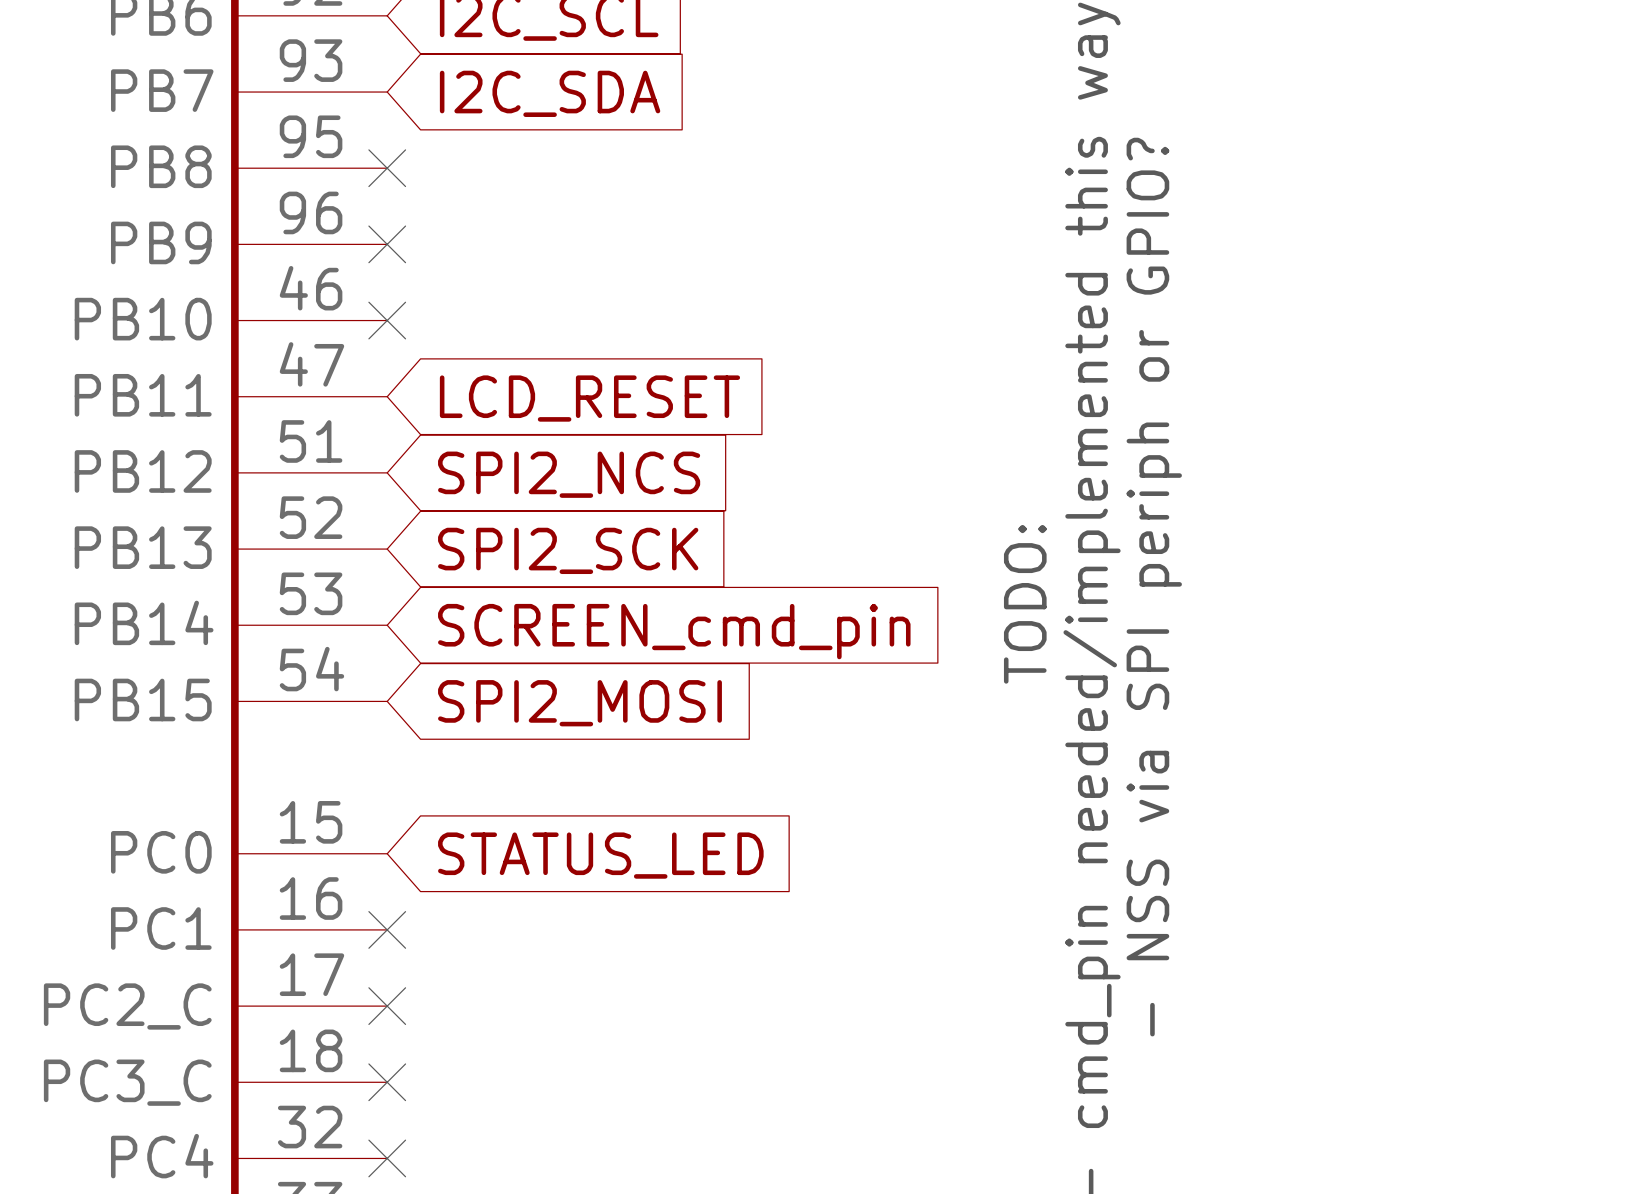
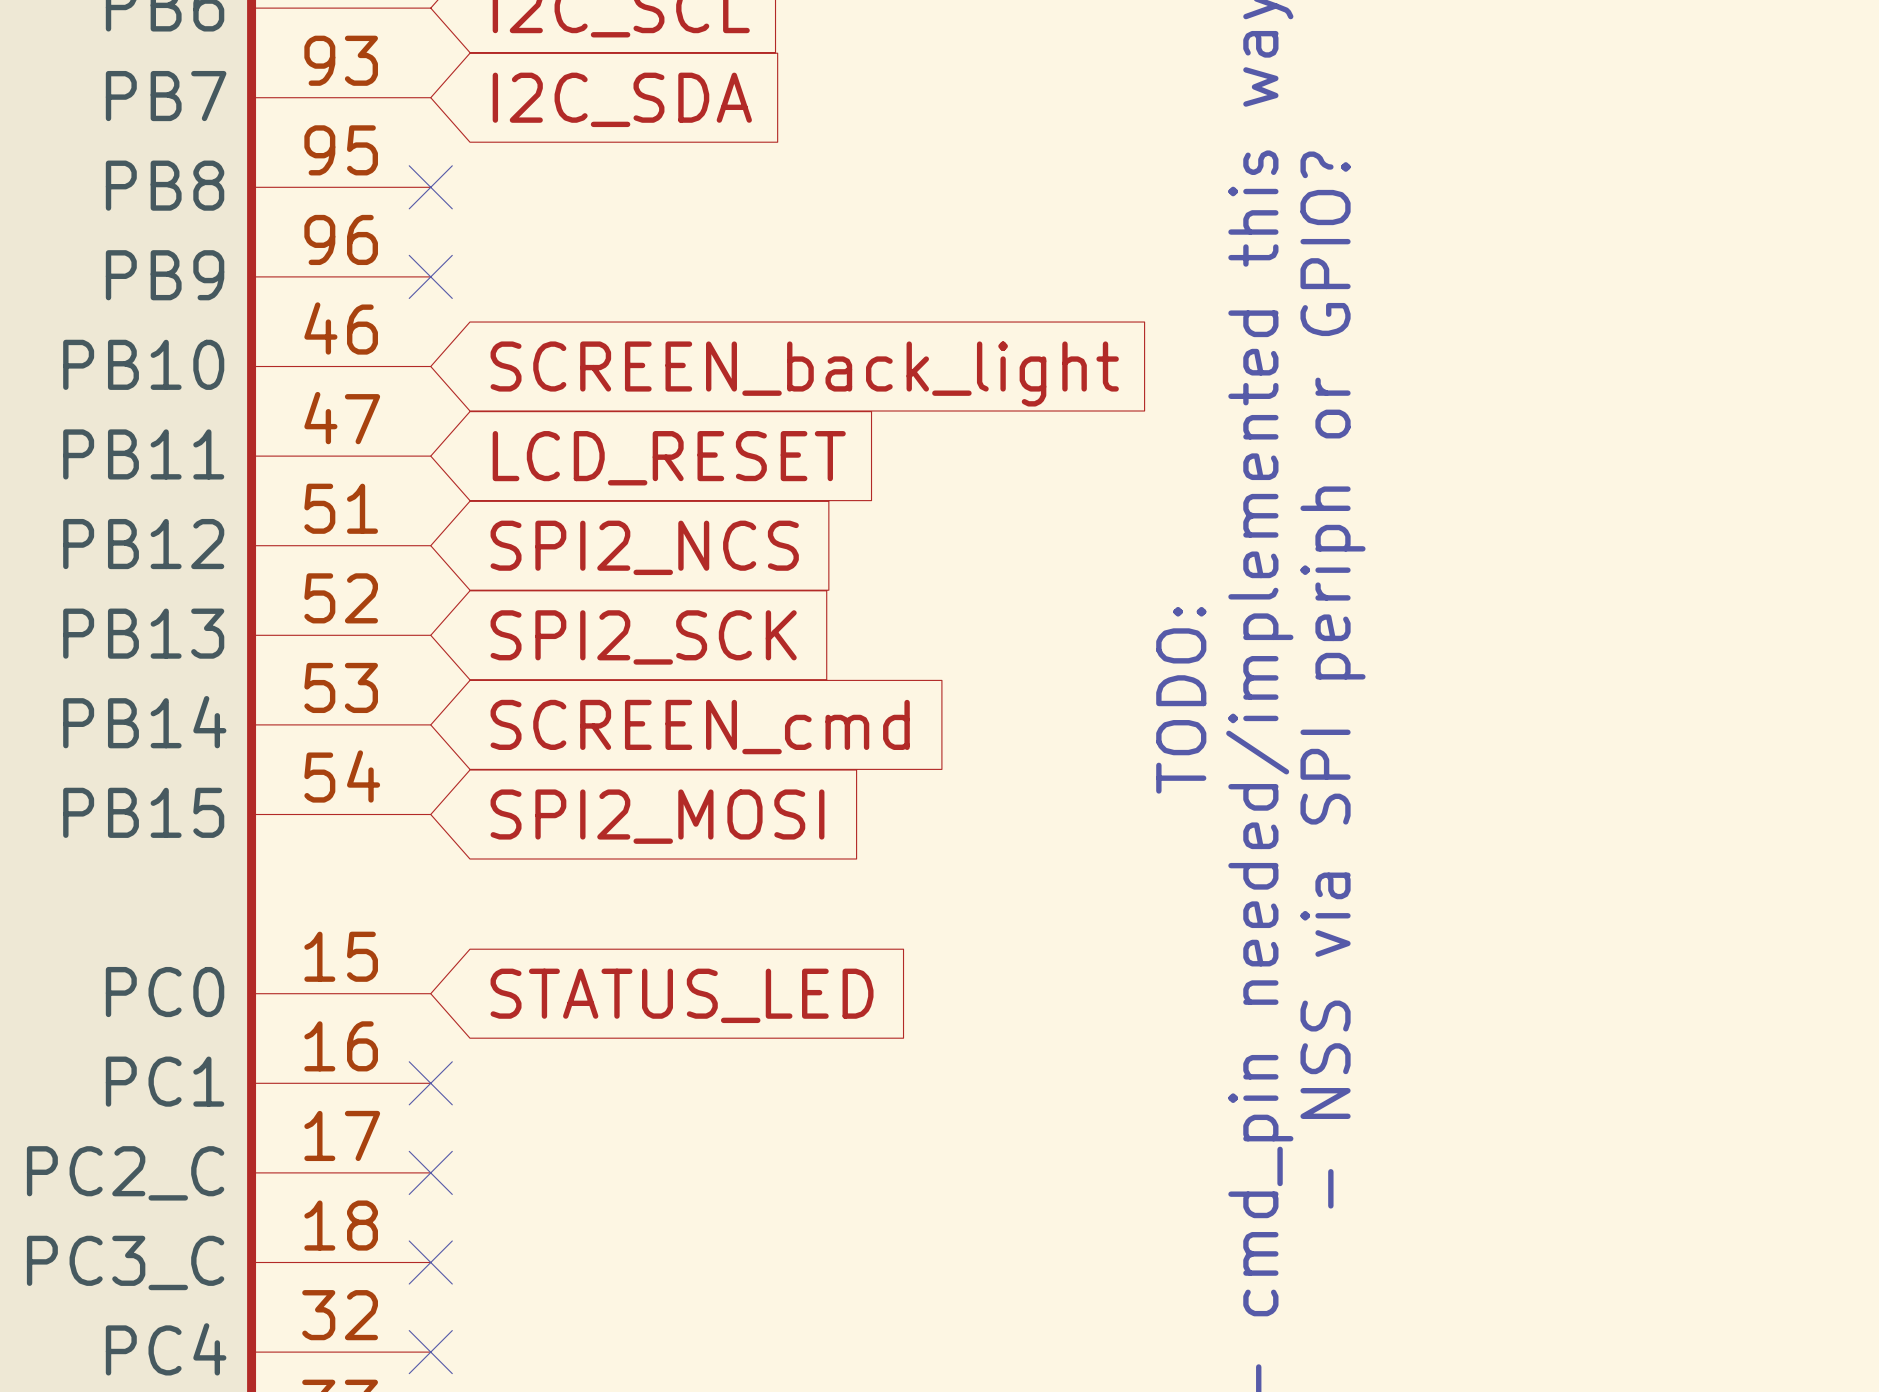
no-connect mark: (387, 320) -> none
global label: none -> SCREEN_back_light (804, 373)
global label: SCREEN_cmd_pin (674, 631) -> SCREEN_cmd (700, 727)

